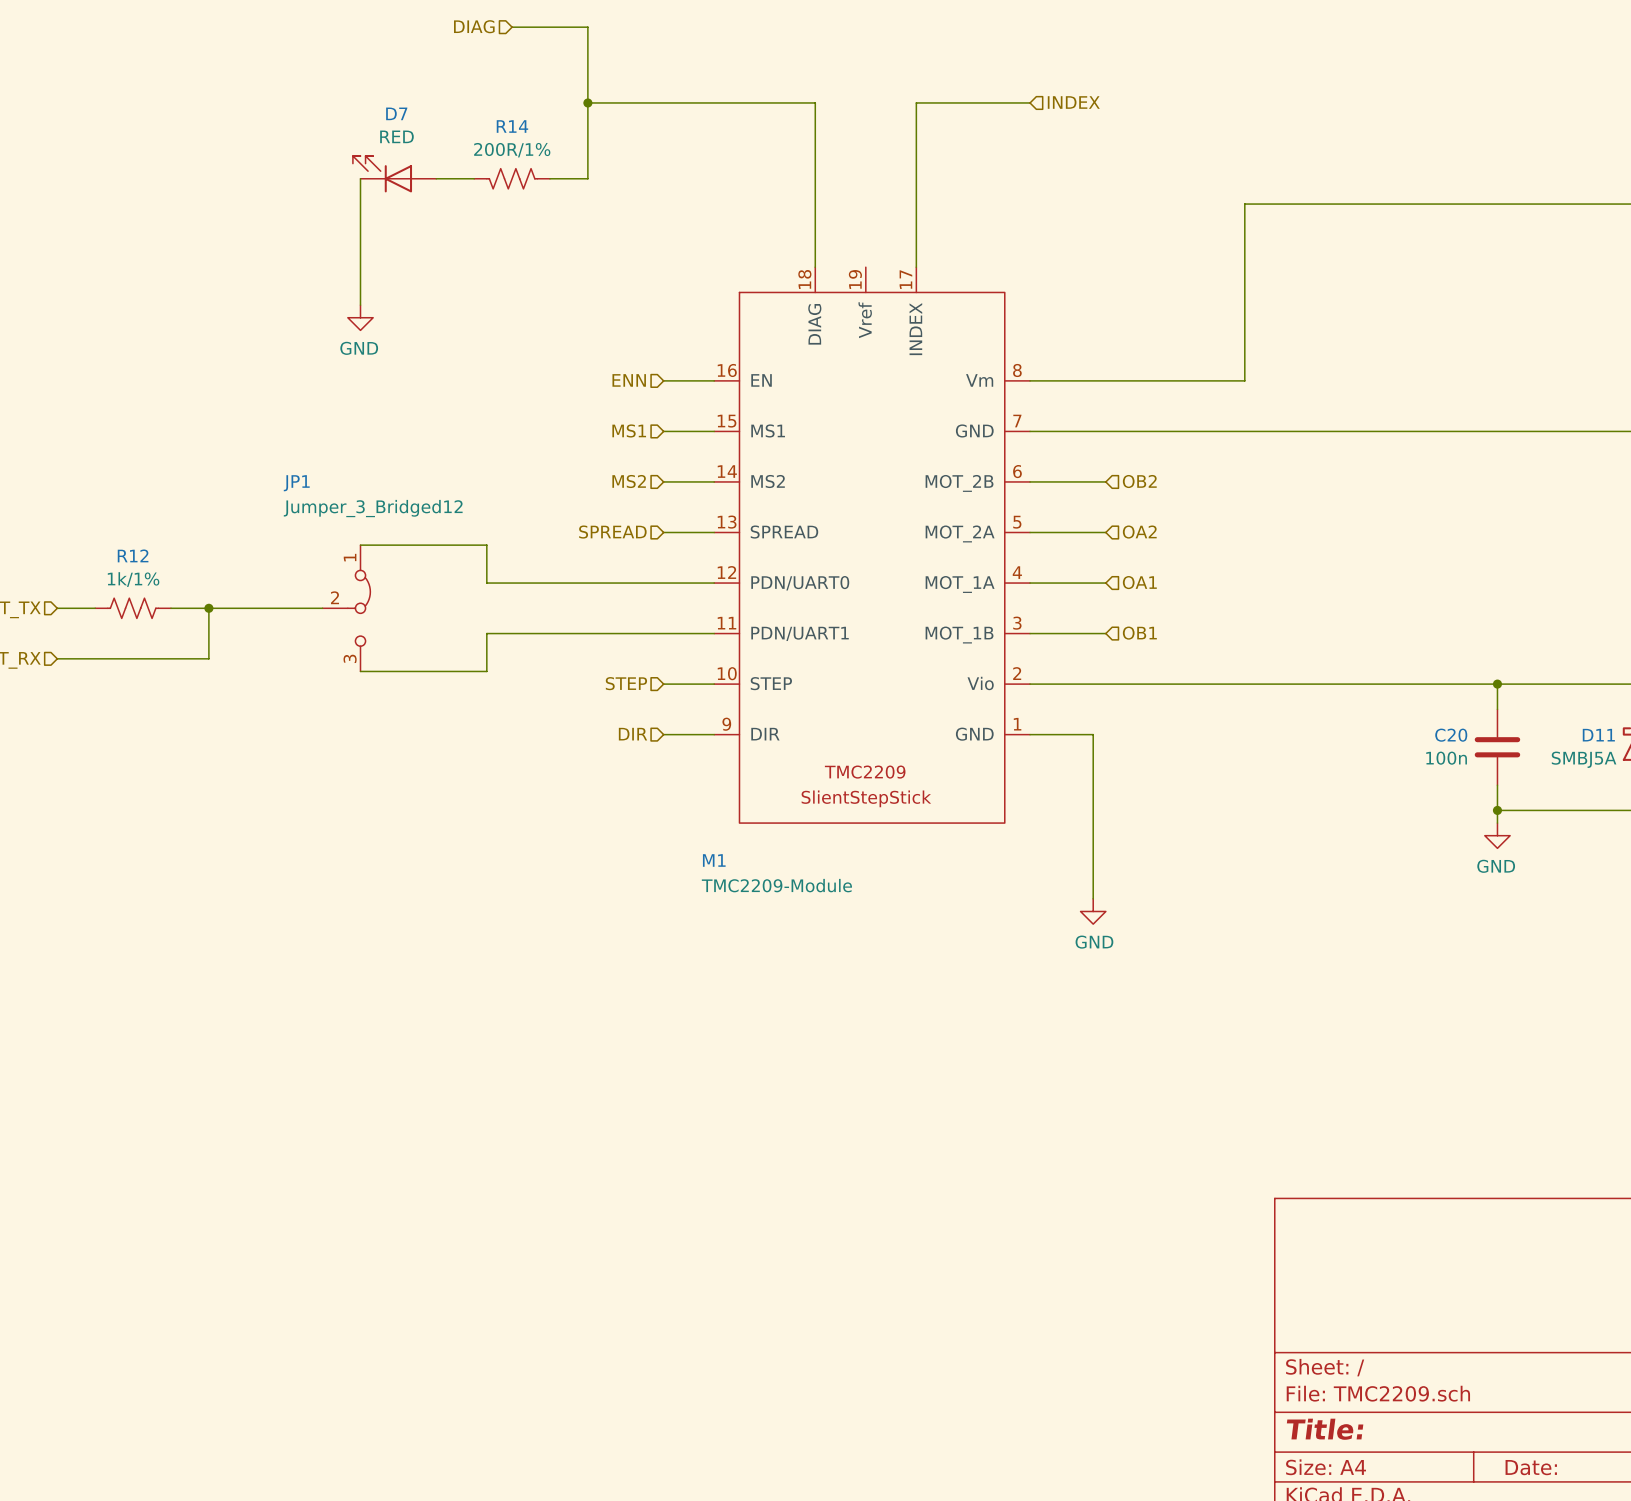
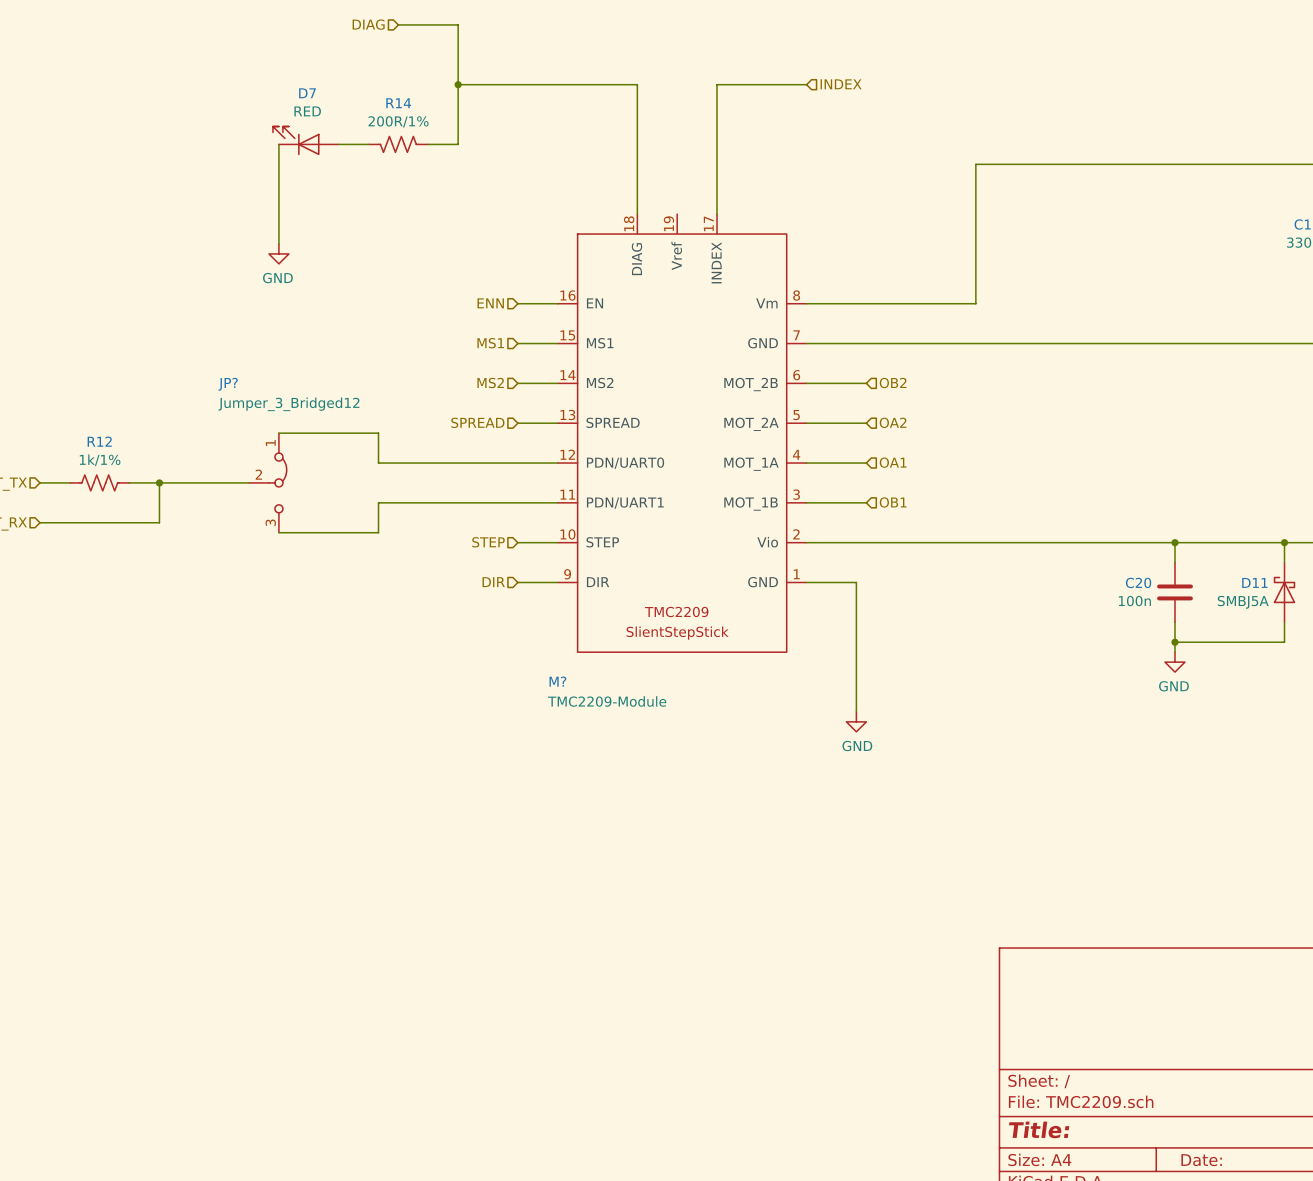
JP1 name: JP1 (296, 483) -> JP? (228, 384)
M1 name: M1 (714, 860) -> M? (557, 681)

